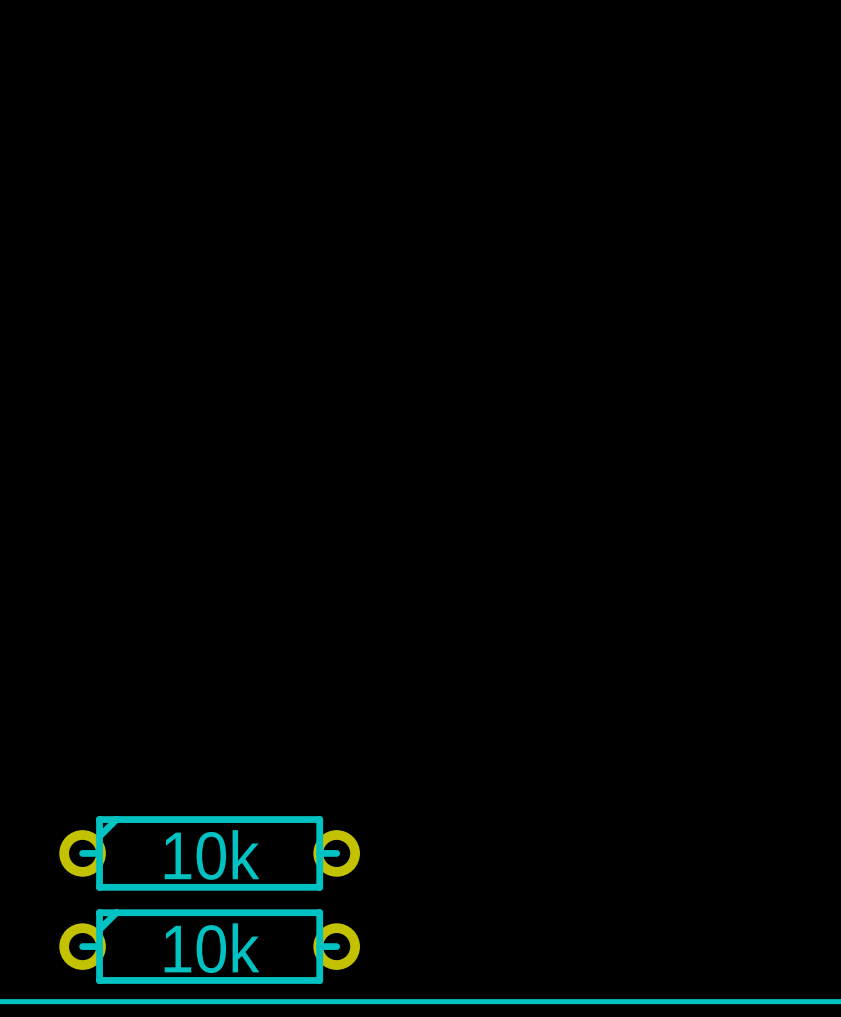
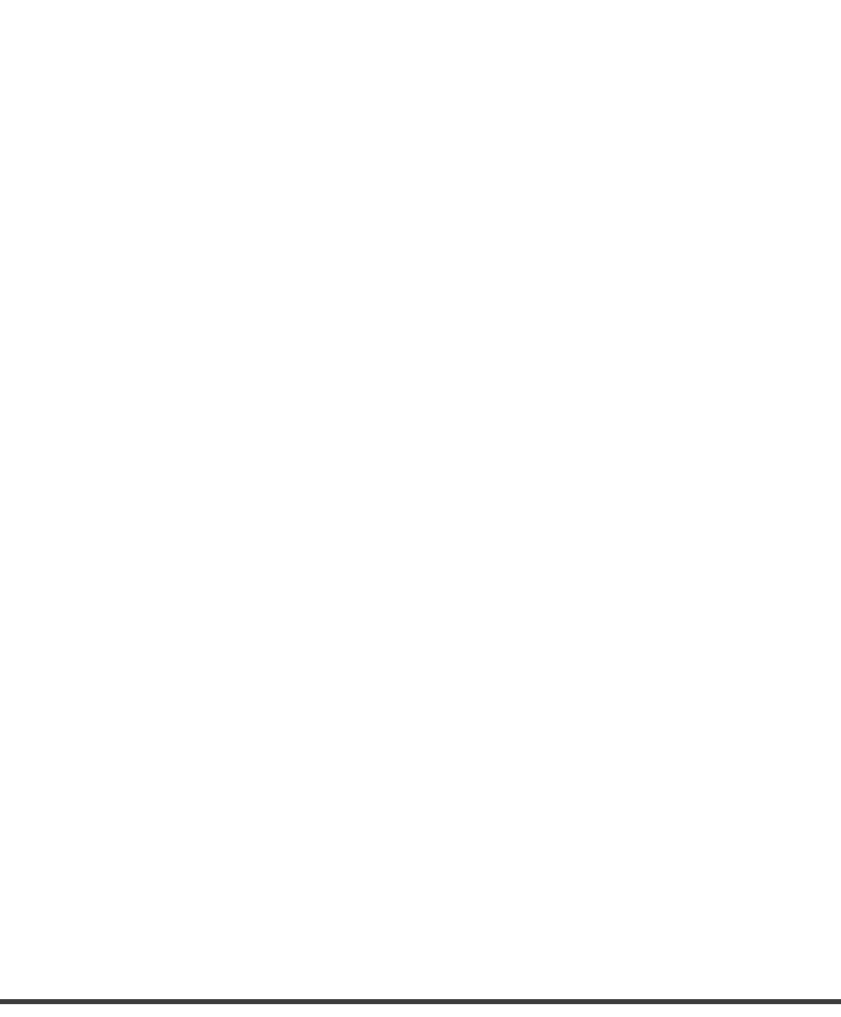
part: 10k (209, 853) -> none
part: 10k (209, 946) -> none

